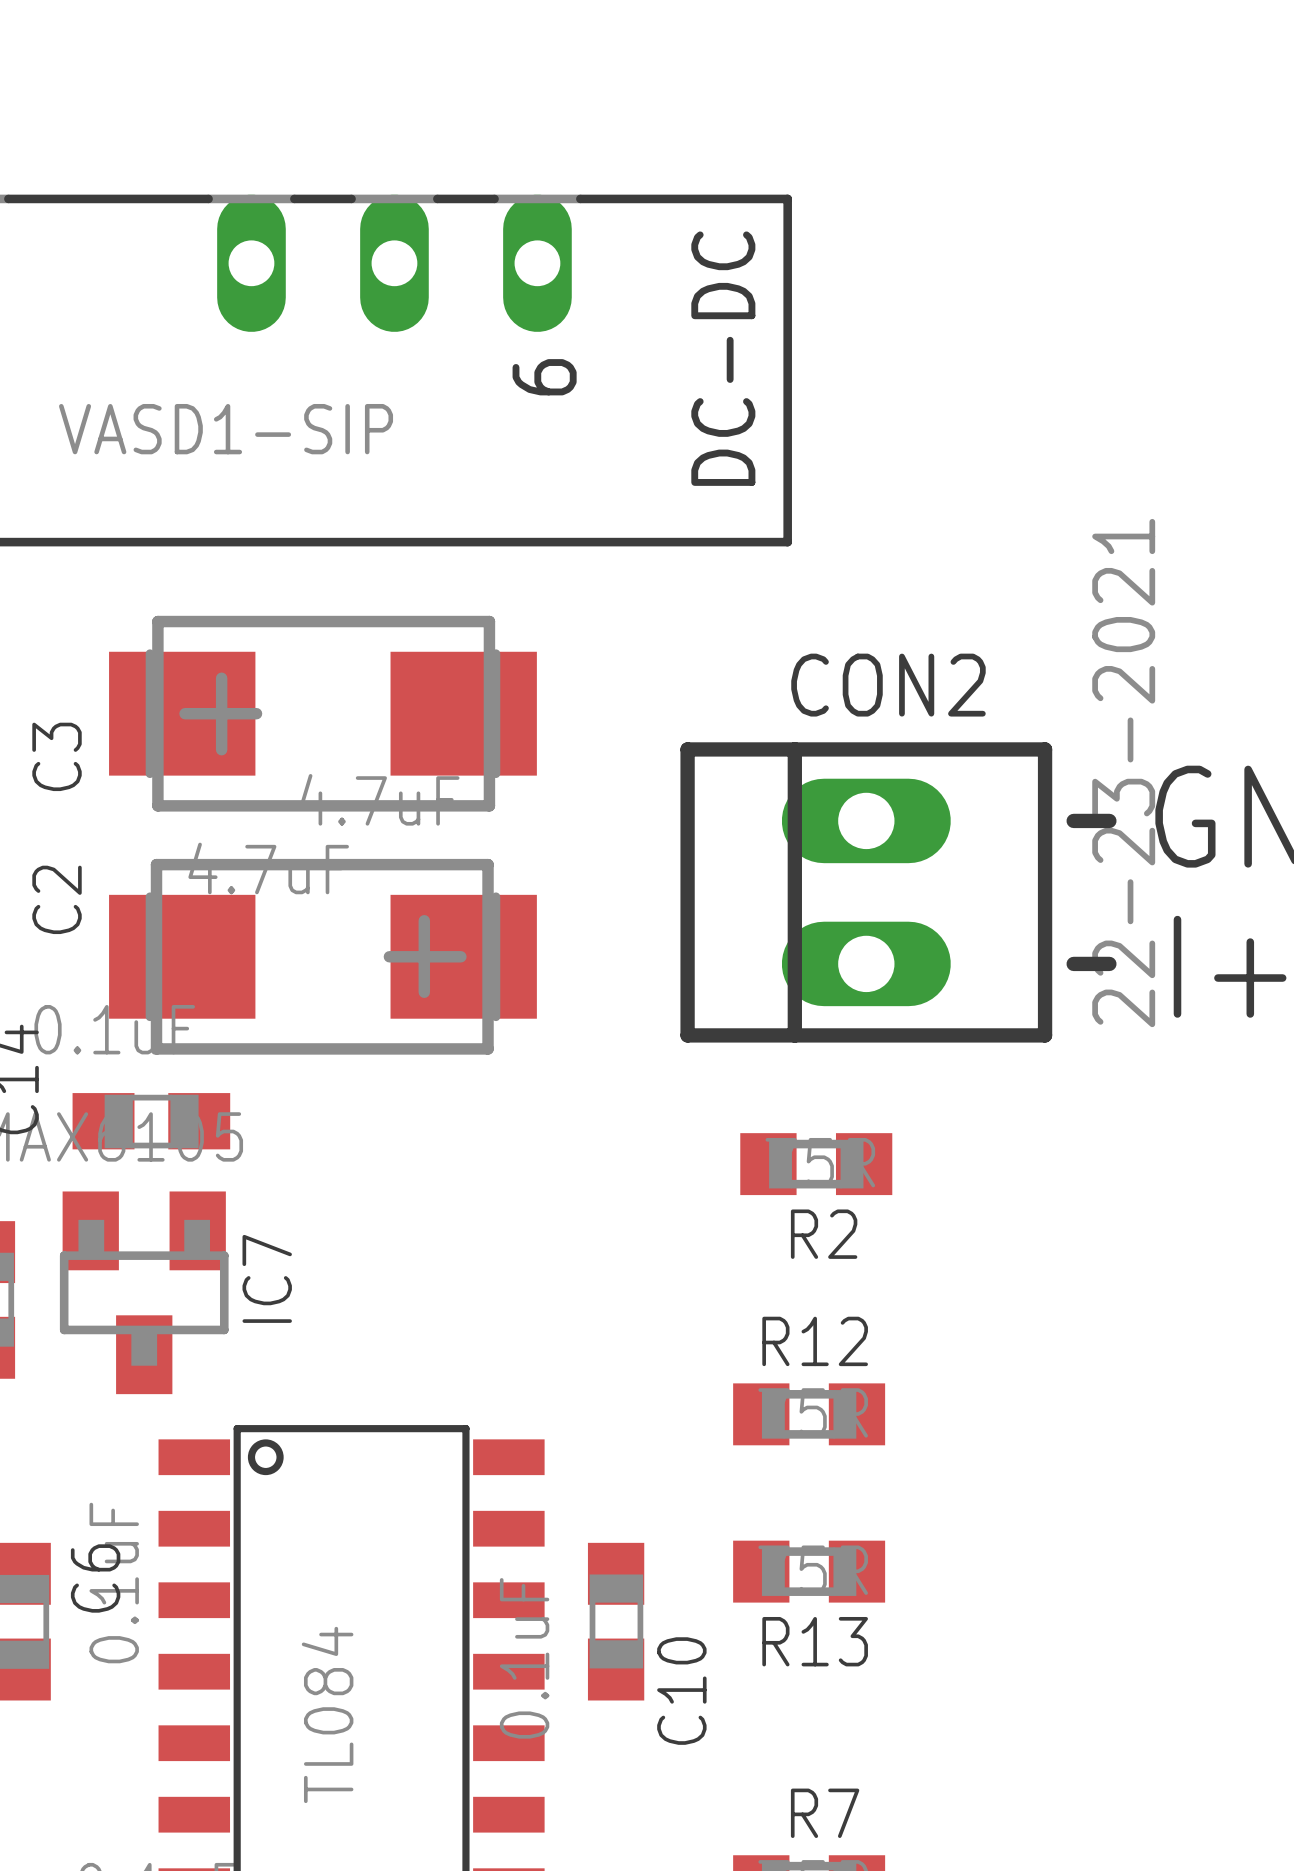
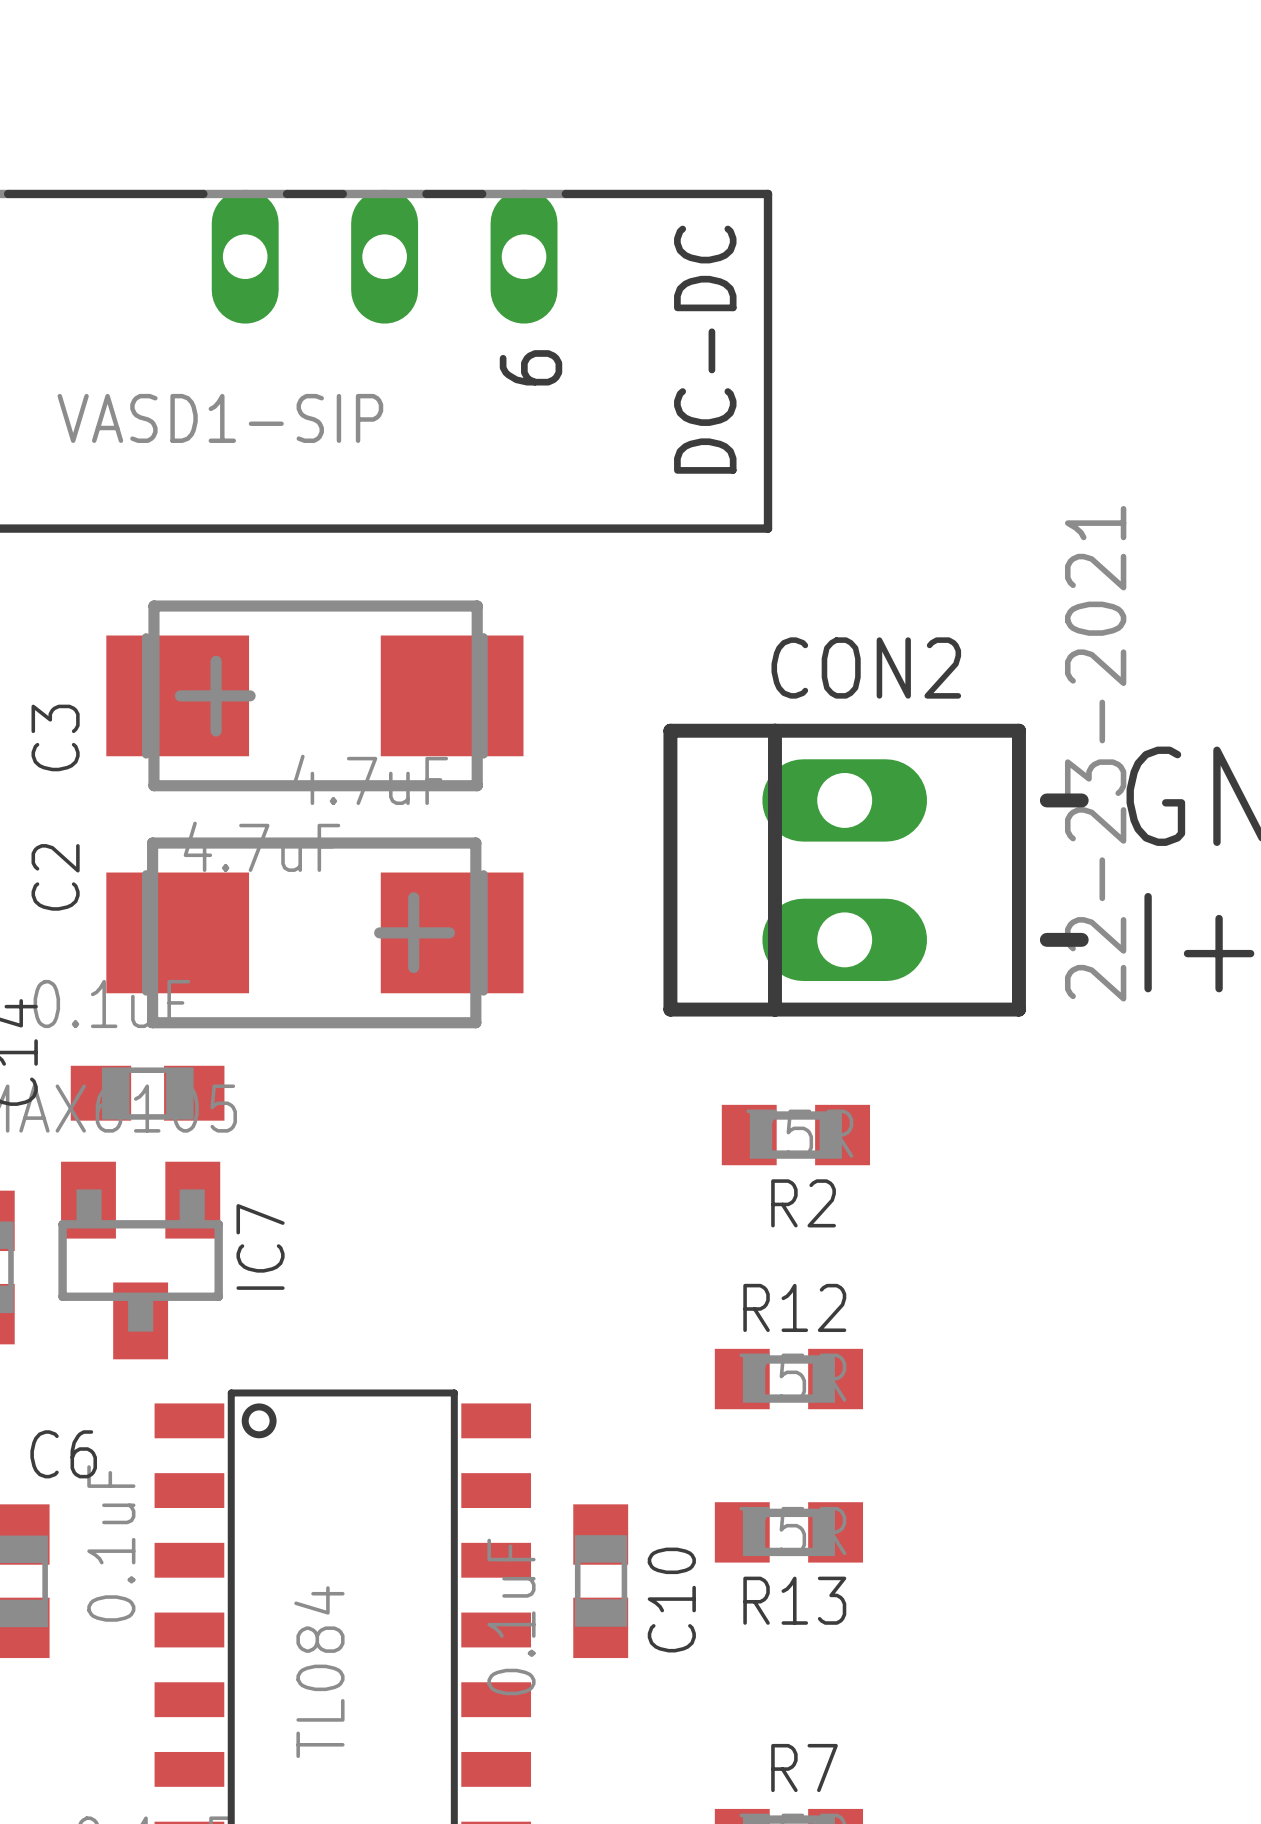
C6 name rotation: 0° (95, 1578) -> 90° clockwise (63, 1454)
C10 name position: C10 (681, 1691) -> C10 (671, 1600)

